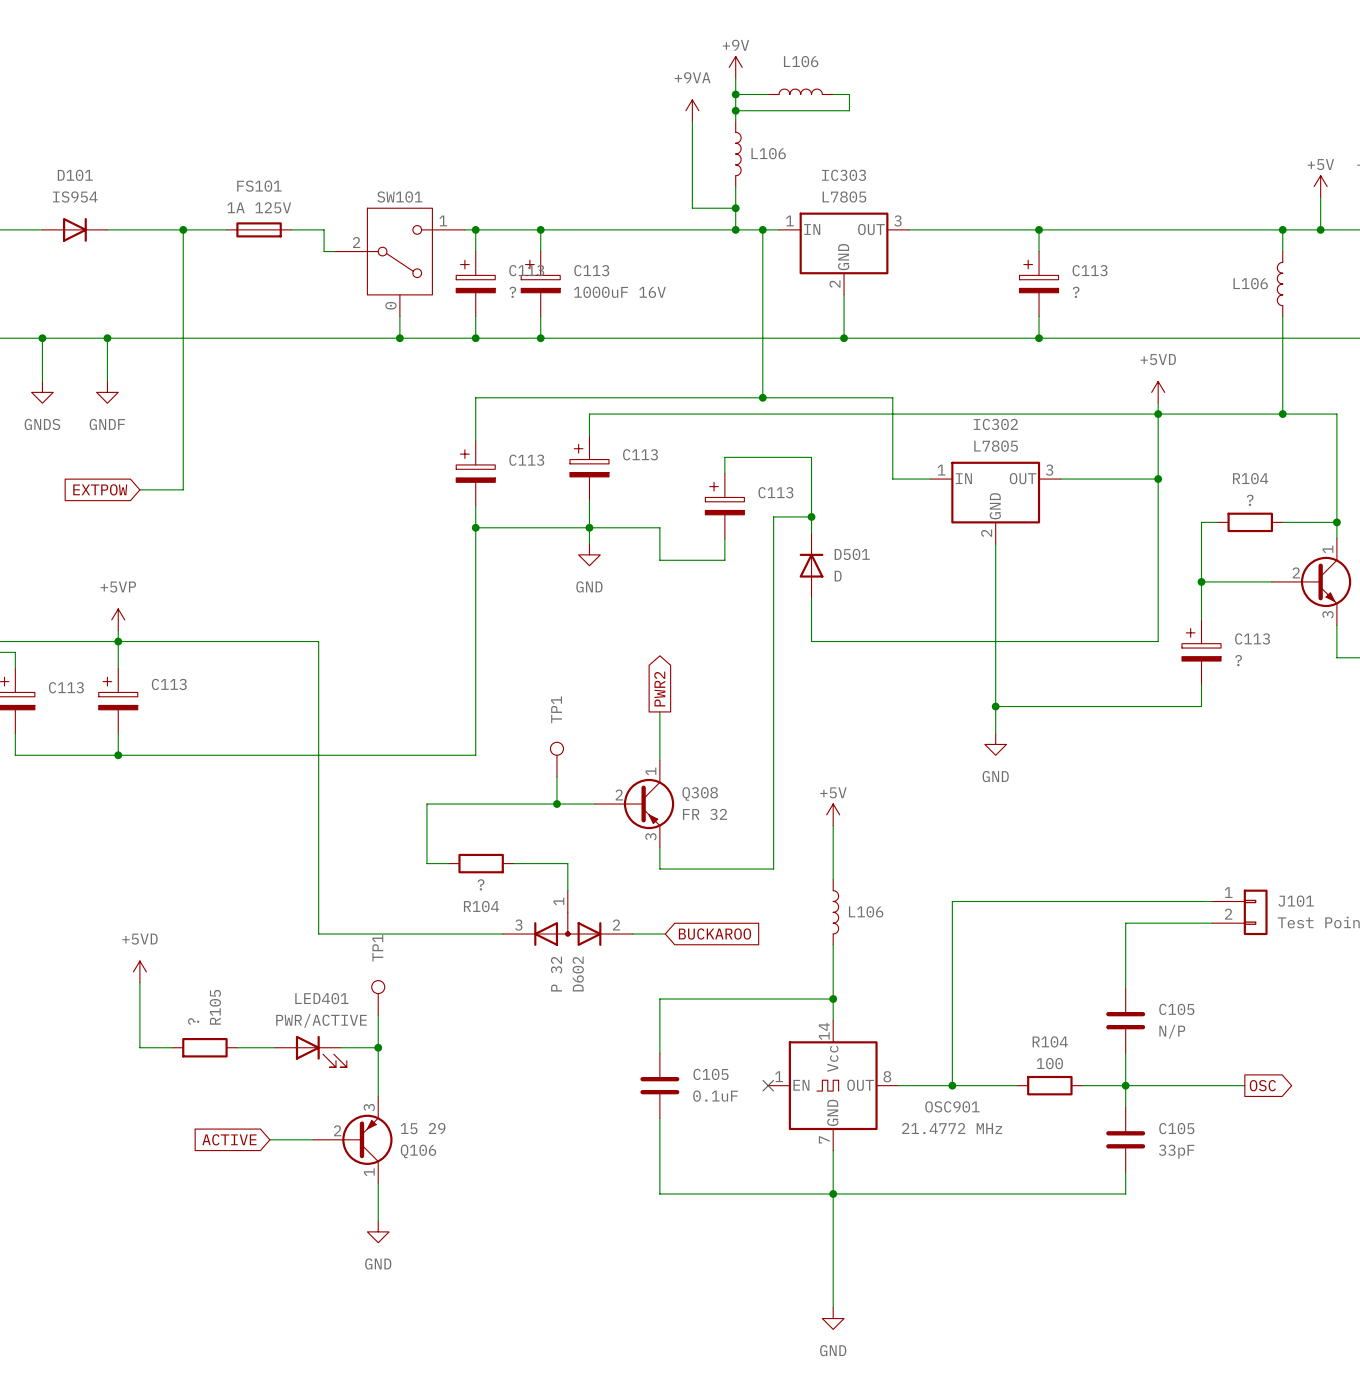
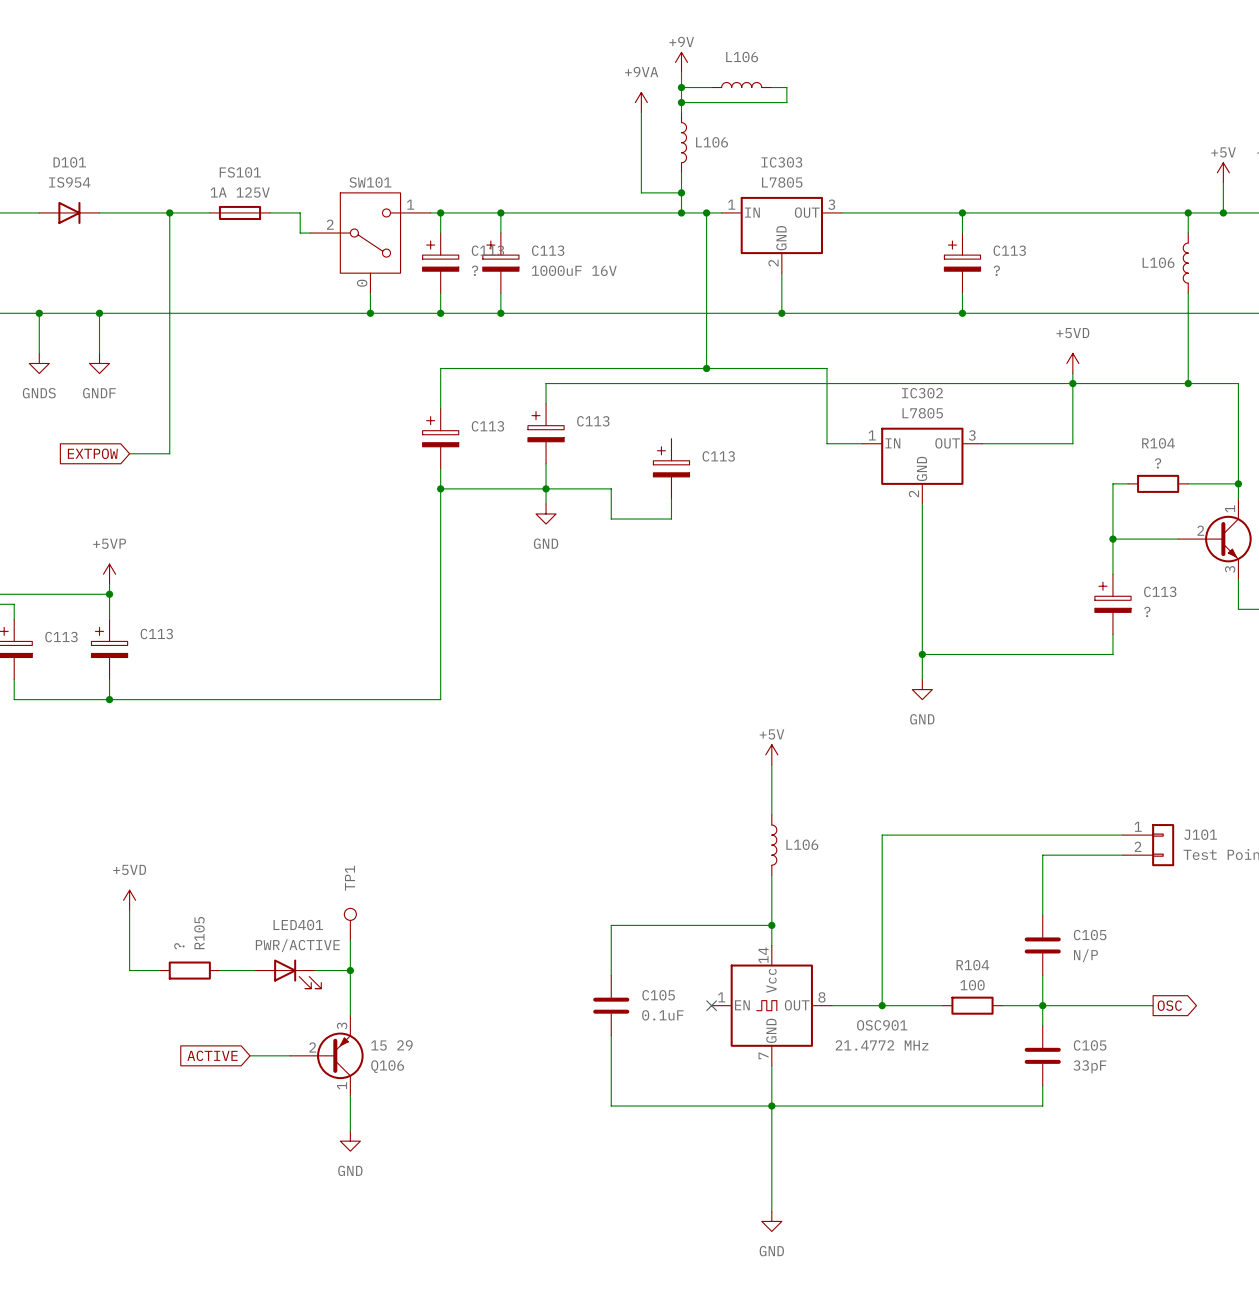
wire: (724, 473) (724, 457) (811, 457) (811, 533) -> none
wire: (1158, 479) (1158, 641) (811, 641) (811, 598) -> none
junction: (1158, 479) -> none
wire: (811, 516) (773, 516) (773, 869) (659, 869) (659, 847) -> none
junction: (811, 516) -> none
D501: D (811, 565) -> none
wire: (118, 641) (318, 641) (318, 934) (502, 934) -> none
global label: PWR2 (659, 689) -> none
wire: (659, 711) (659, 760) -> none
TP1: (556, 759) -> none
wire: (556, 776) (556, 804) -> none
junction: (556, 804) -> none
wire: (594, 804) (426, 804) (426, 863) (448, 863) -> none
Q308: FR 32 (634, 804) -> none
R104: ? (481, 863) -> none
wire: (513, 863) (567, 863) (567, 890) -> none
D602: P 32 (567, 918) -> none
wire: (632, 934) (665, 934) -> none
global label: BUCKAROO (714, 934) -> none

